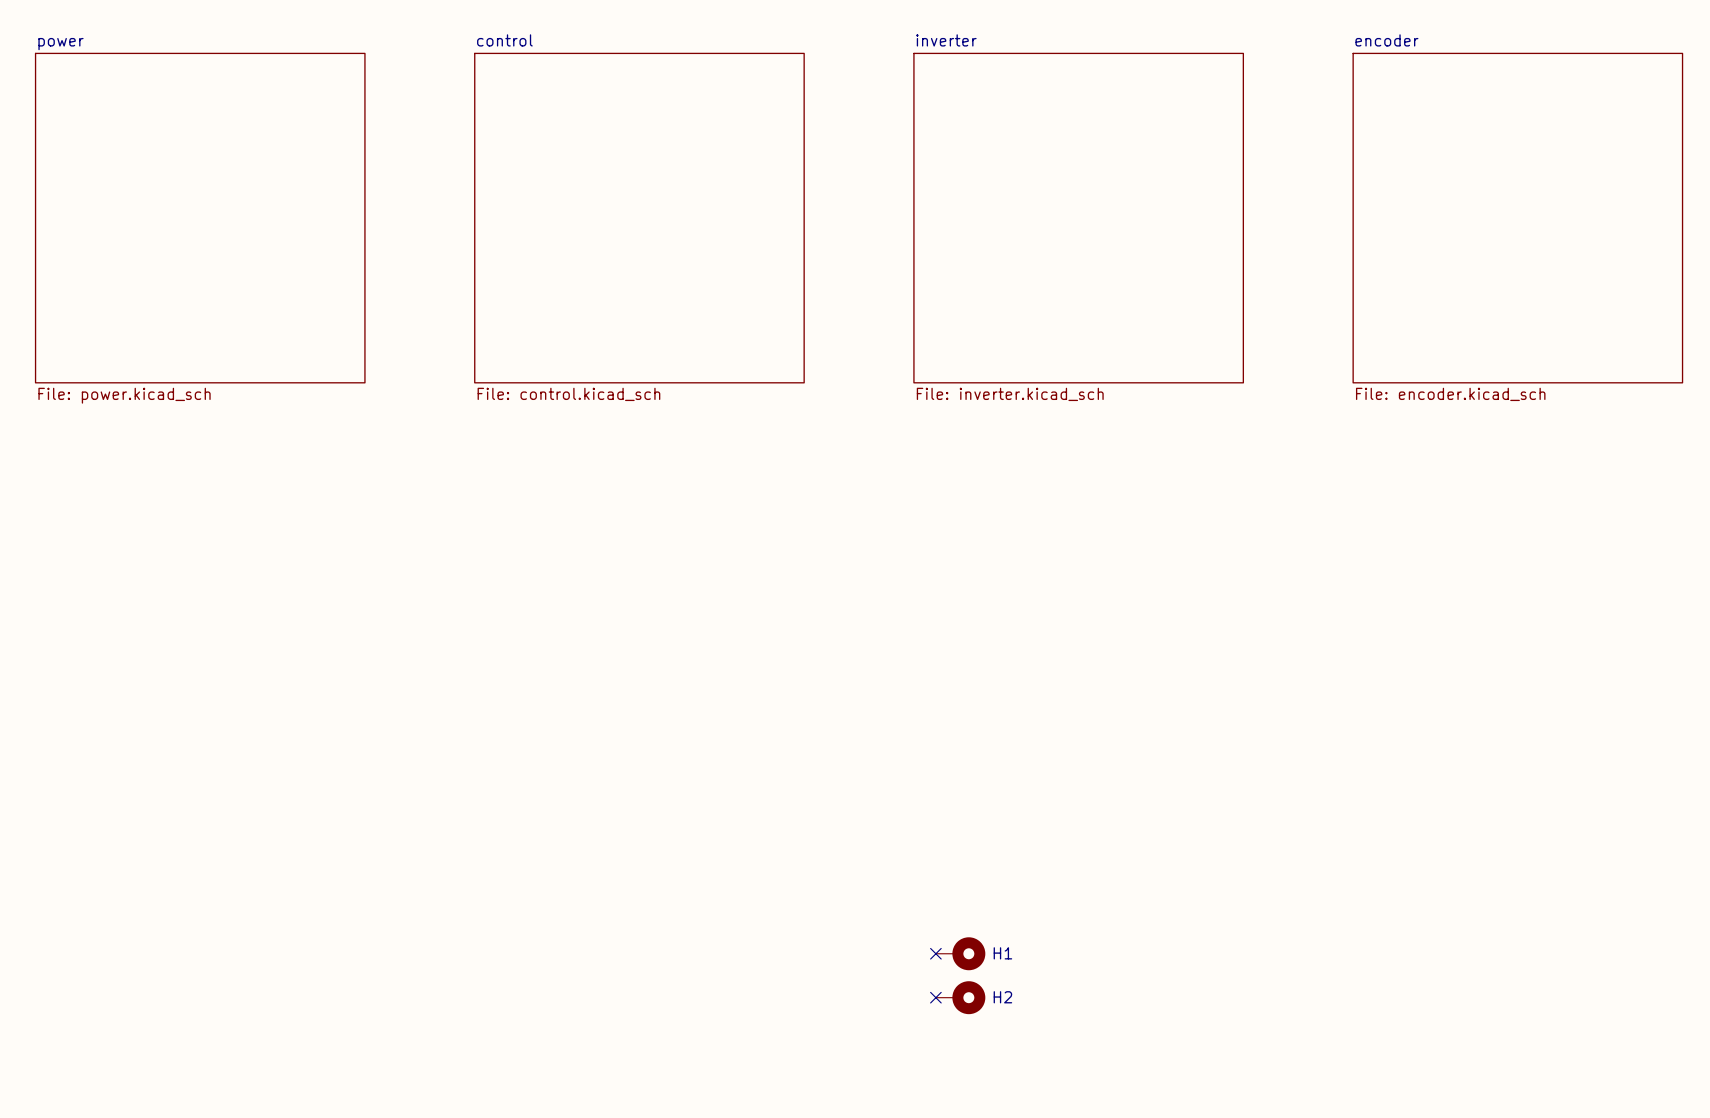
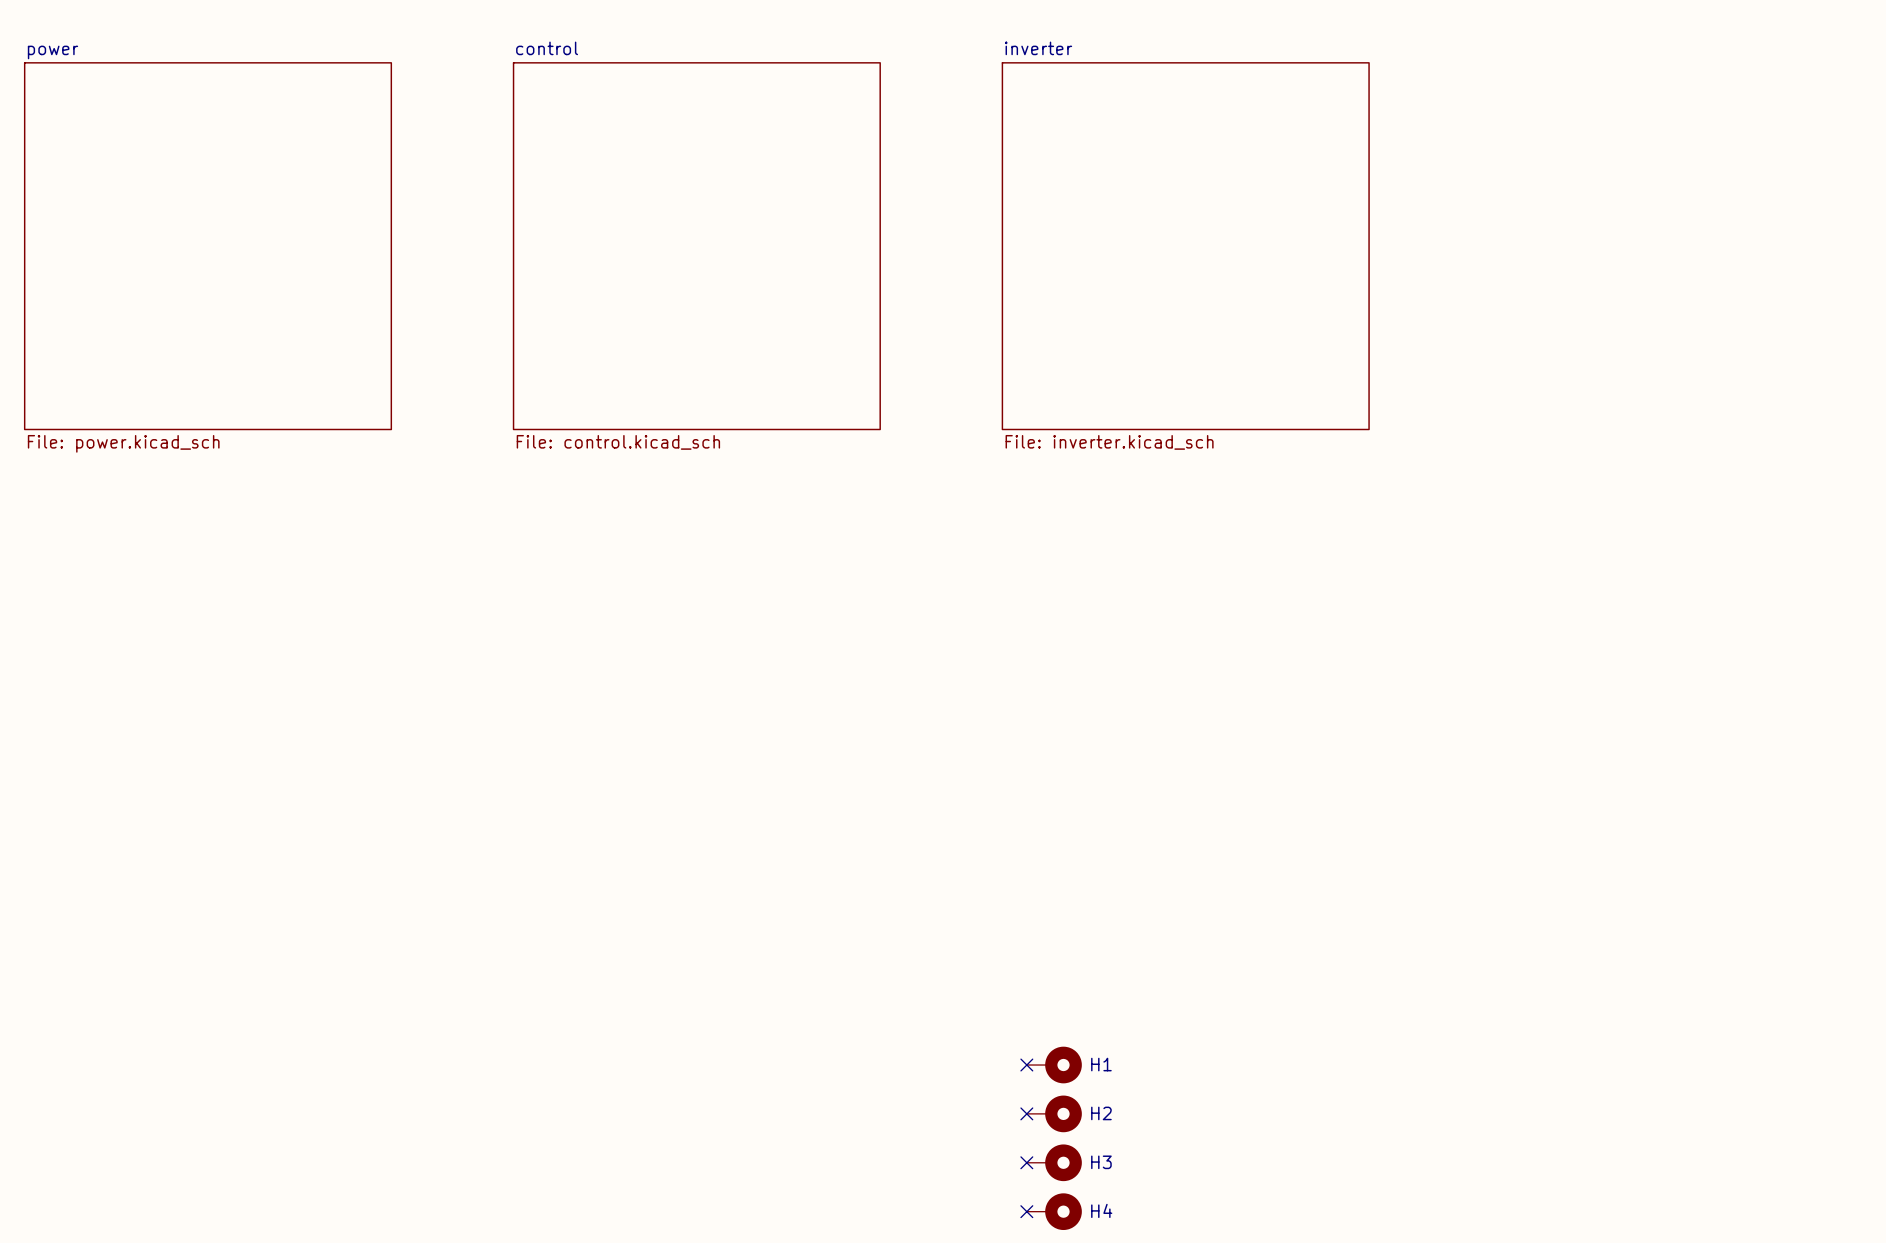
sheet encoder: File: encoder.kicad_sch (1517, 218) -> none
no-connect mark: none -> (1026, 1162)
H3: none -> (1054, 1162)
no-connect mark: none -> (1026, 1211)
H4: none -> (1054, 1211)

